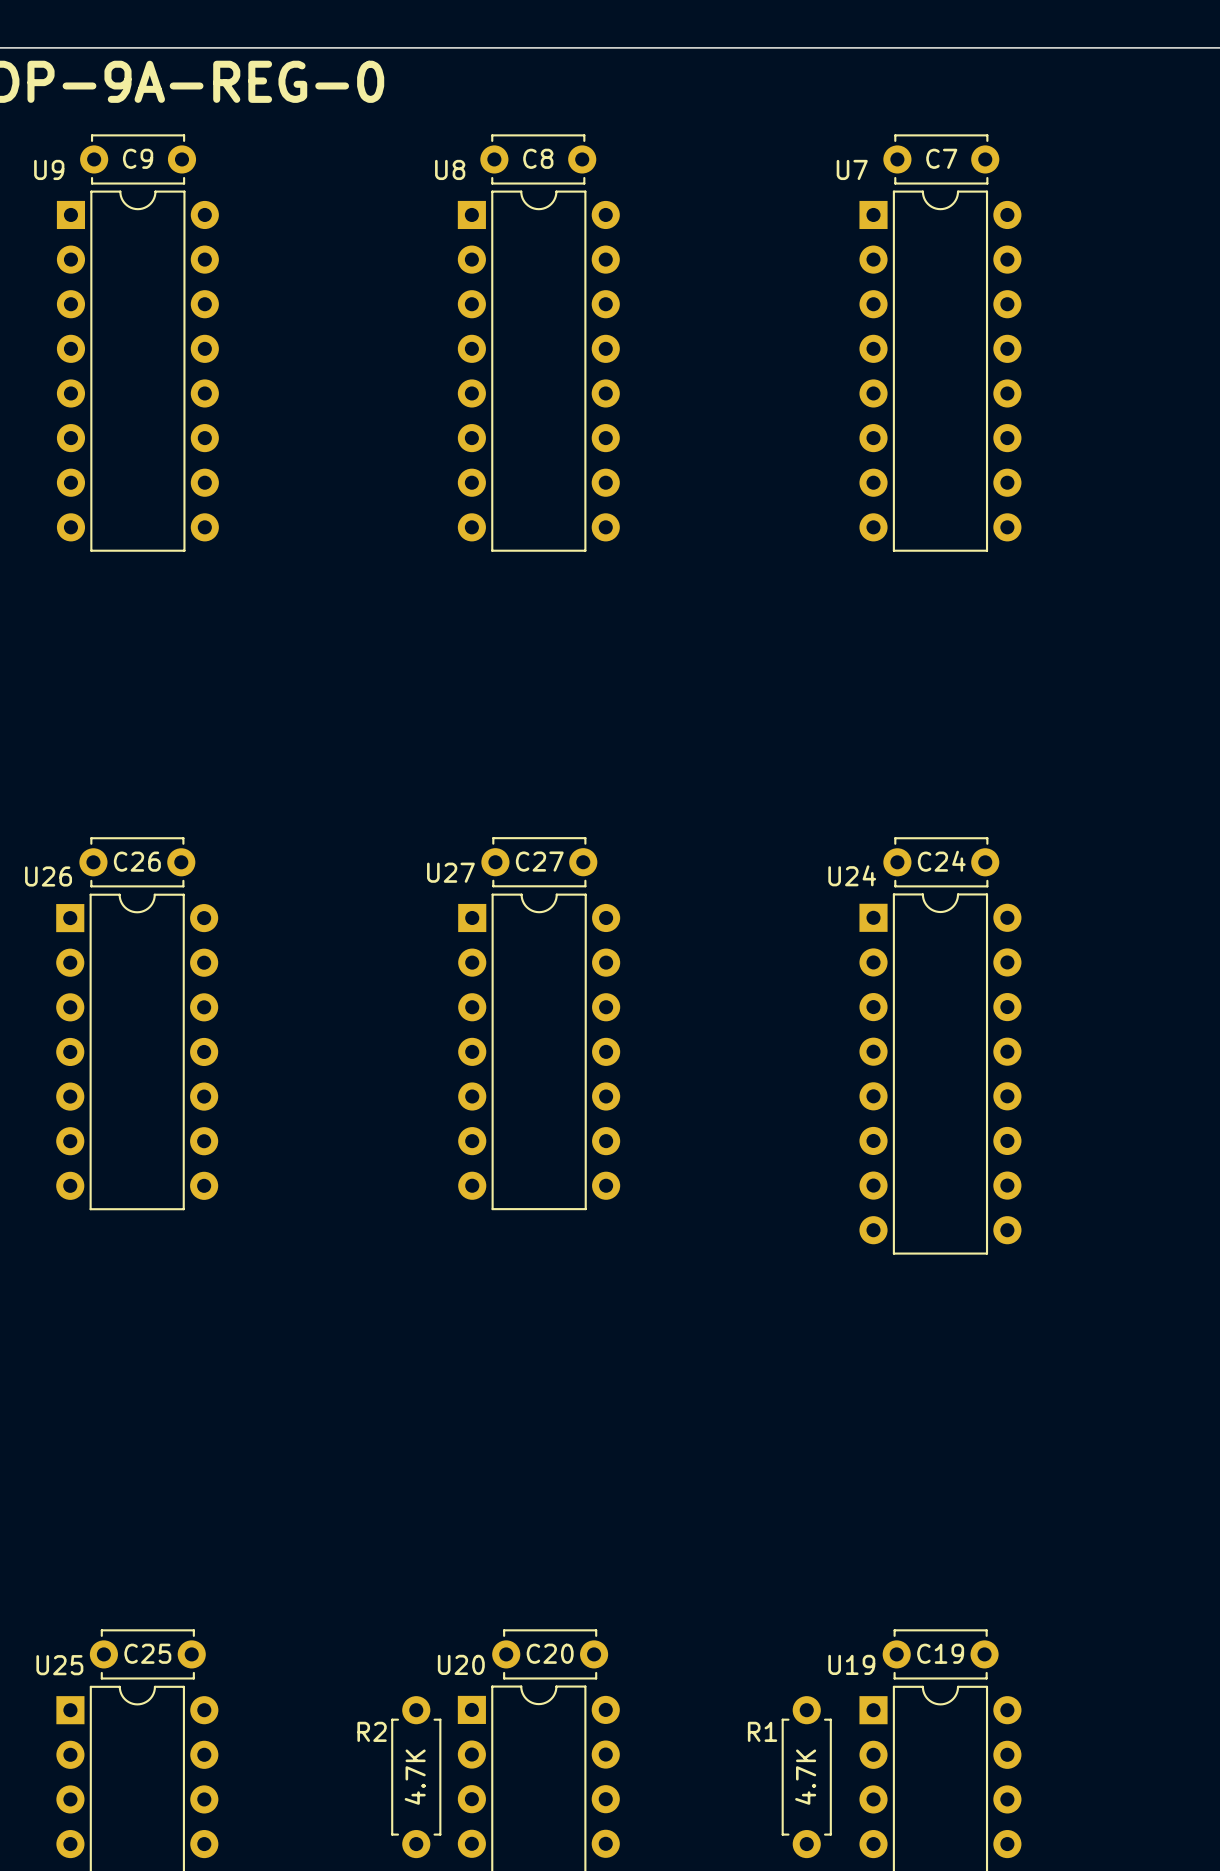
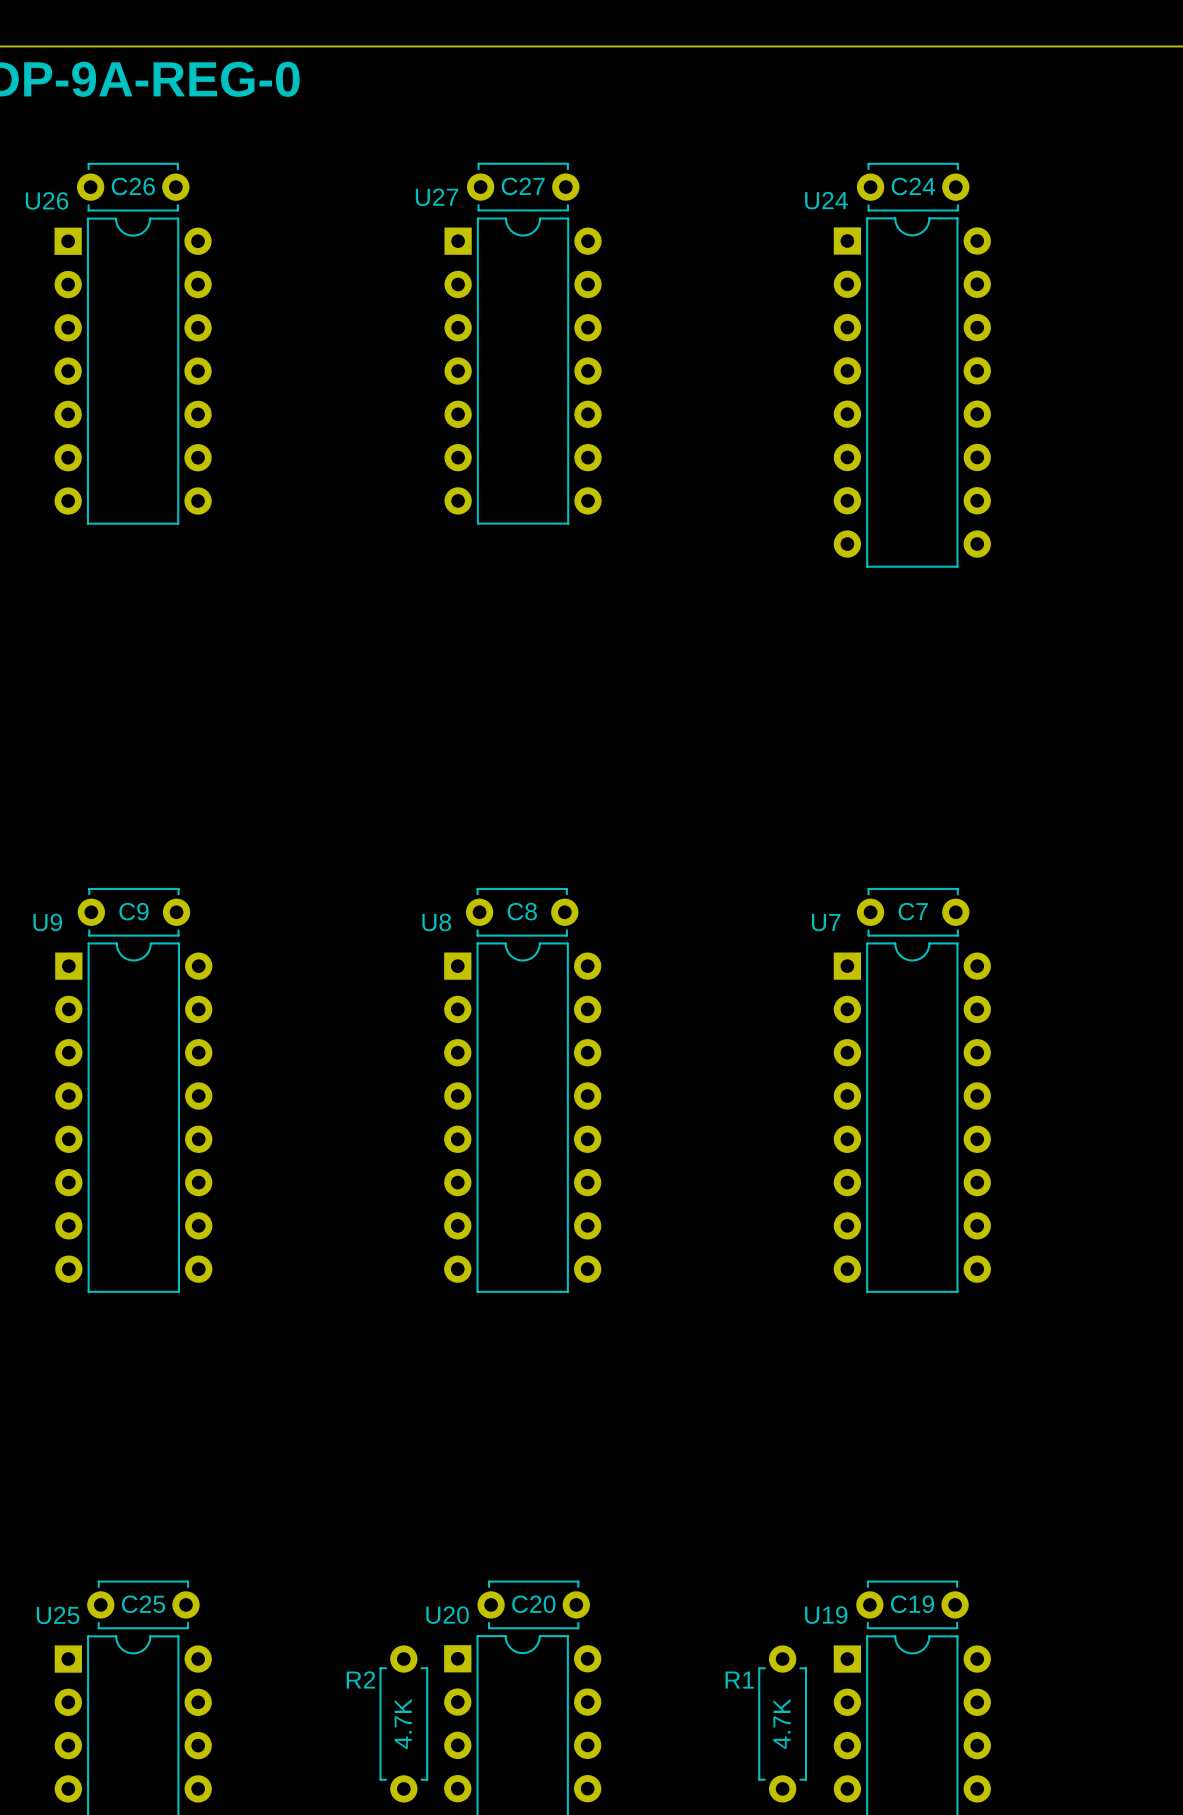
C9 position: (138, 159) -> (133, 912)
C8 position: (538, 159) -> (522, 912)
C7 position: (941, 159) -> (913, 912)
U9 position: (137, 371) -> (133, 1117)
U8 position: (538, 371) -> (522, 1117)
U7 position: (940, 371) -> (912, 1117)
C26 position: (137, 862) -> (133, 187)
C27 position: (539, 862) -> (523, 187)
C24 position: (941, 862) -> (913, 187)
U26 position: (137, 1051) -> (133, 371)
U27 position: (539, 1051) -> (523, 371)
U24 position: (940, 1074) -> (912, 392)

